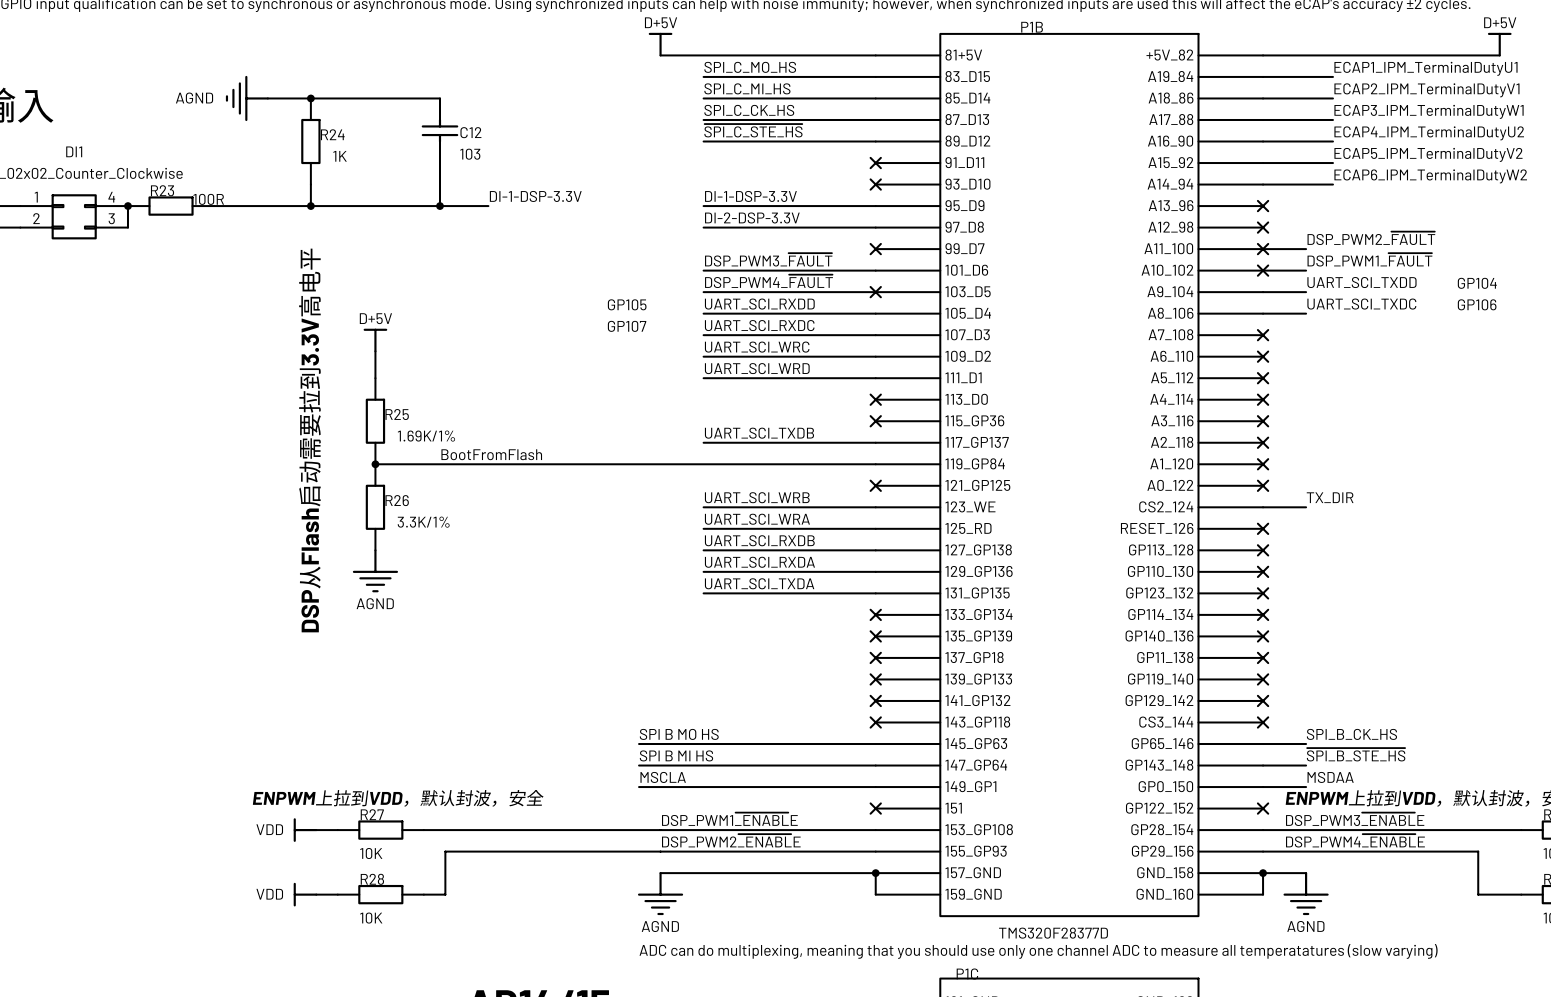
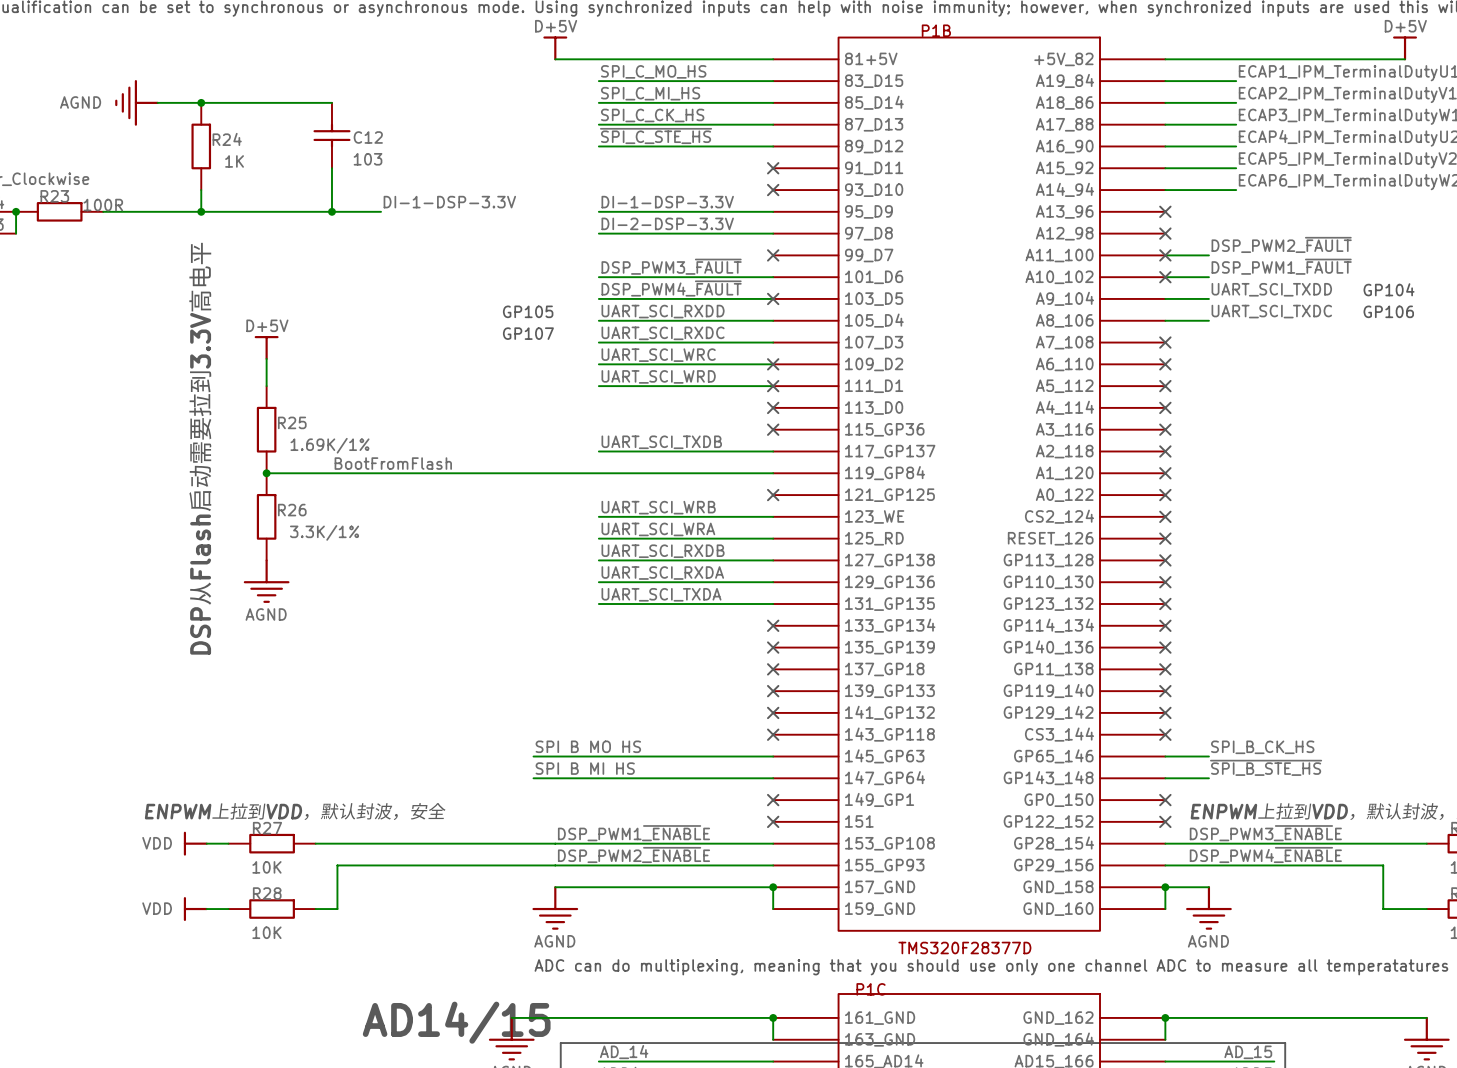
no-connect mark: none -> (773, 364)
no-connect mark: none -> (773, 386)
label: TX_DIR (1330, 497) -> none
wire: (1263, 507) (1306, 507) -> none
no-connect mark: none -> (1165, 516)
label: MSCLA (663, 777) -> none
label: MSDAA (1330, 777) -> none
wire: (639, 787) (875, 787) -> none
no-connect mark: none -> (773, 800)
wire: (1263, 787) (1306, 787) -> none
no-connect mark: none -> (1165, 800)

